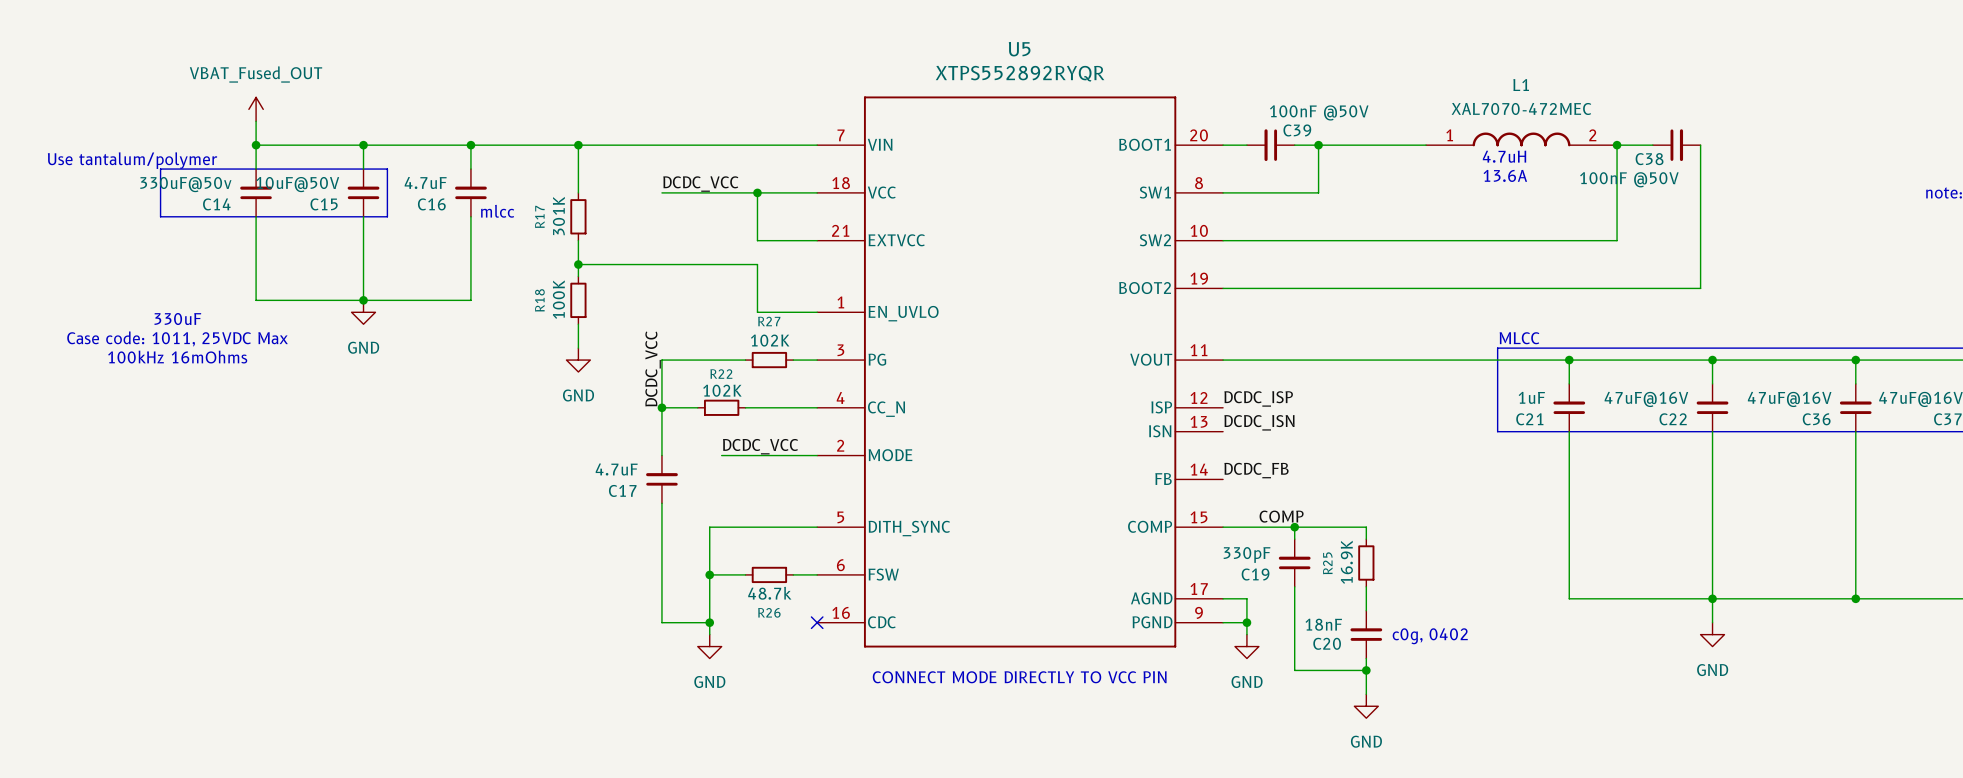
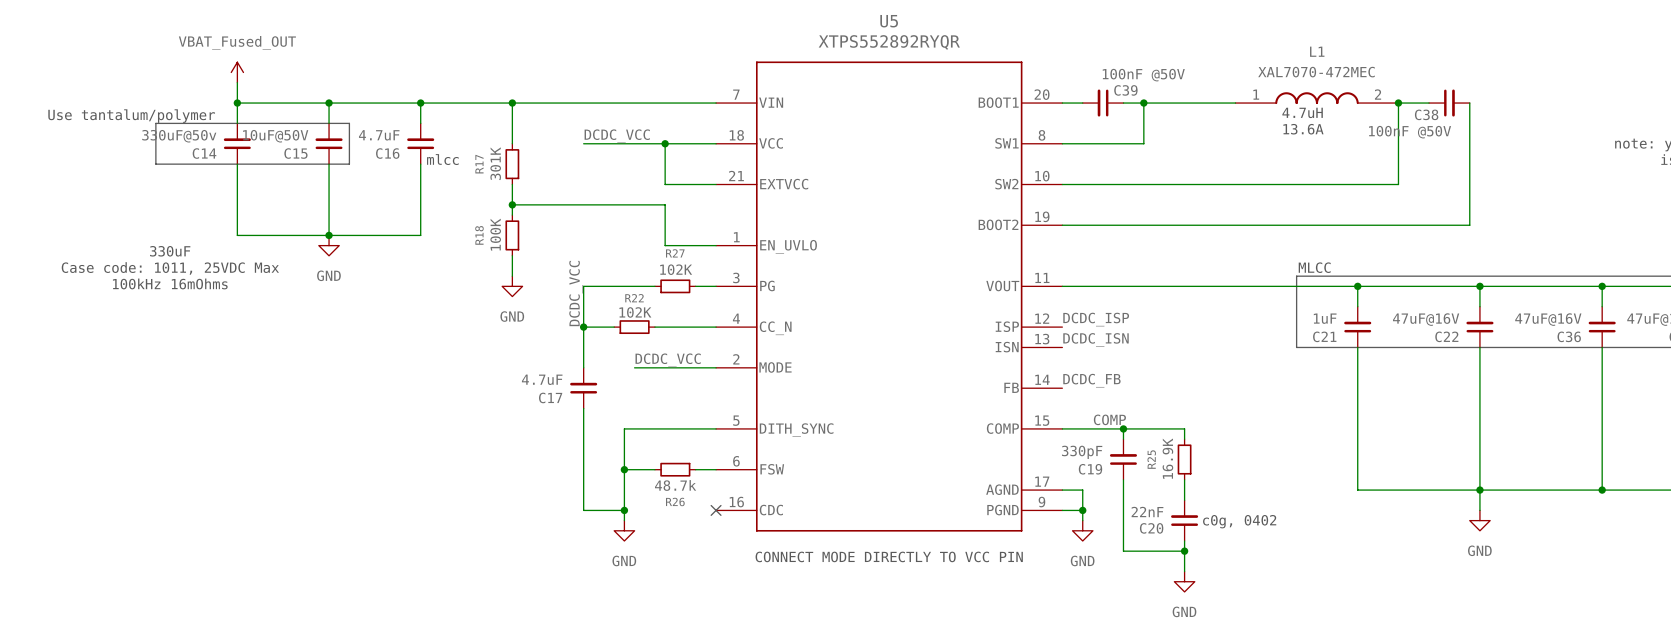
C20 value: 18nF (1323, 624) -> 22nF (1147, 511)

